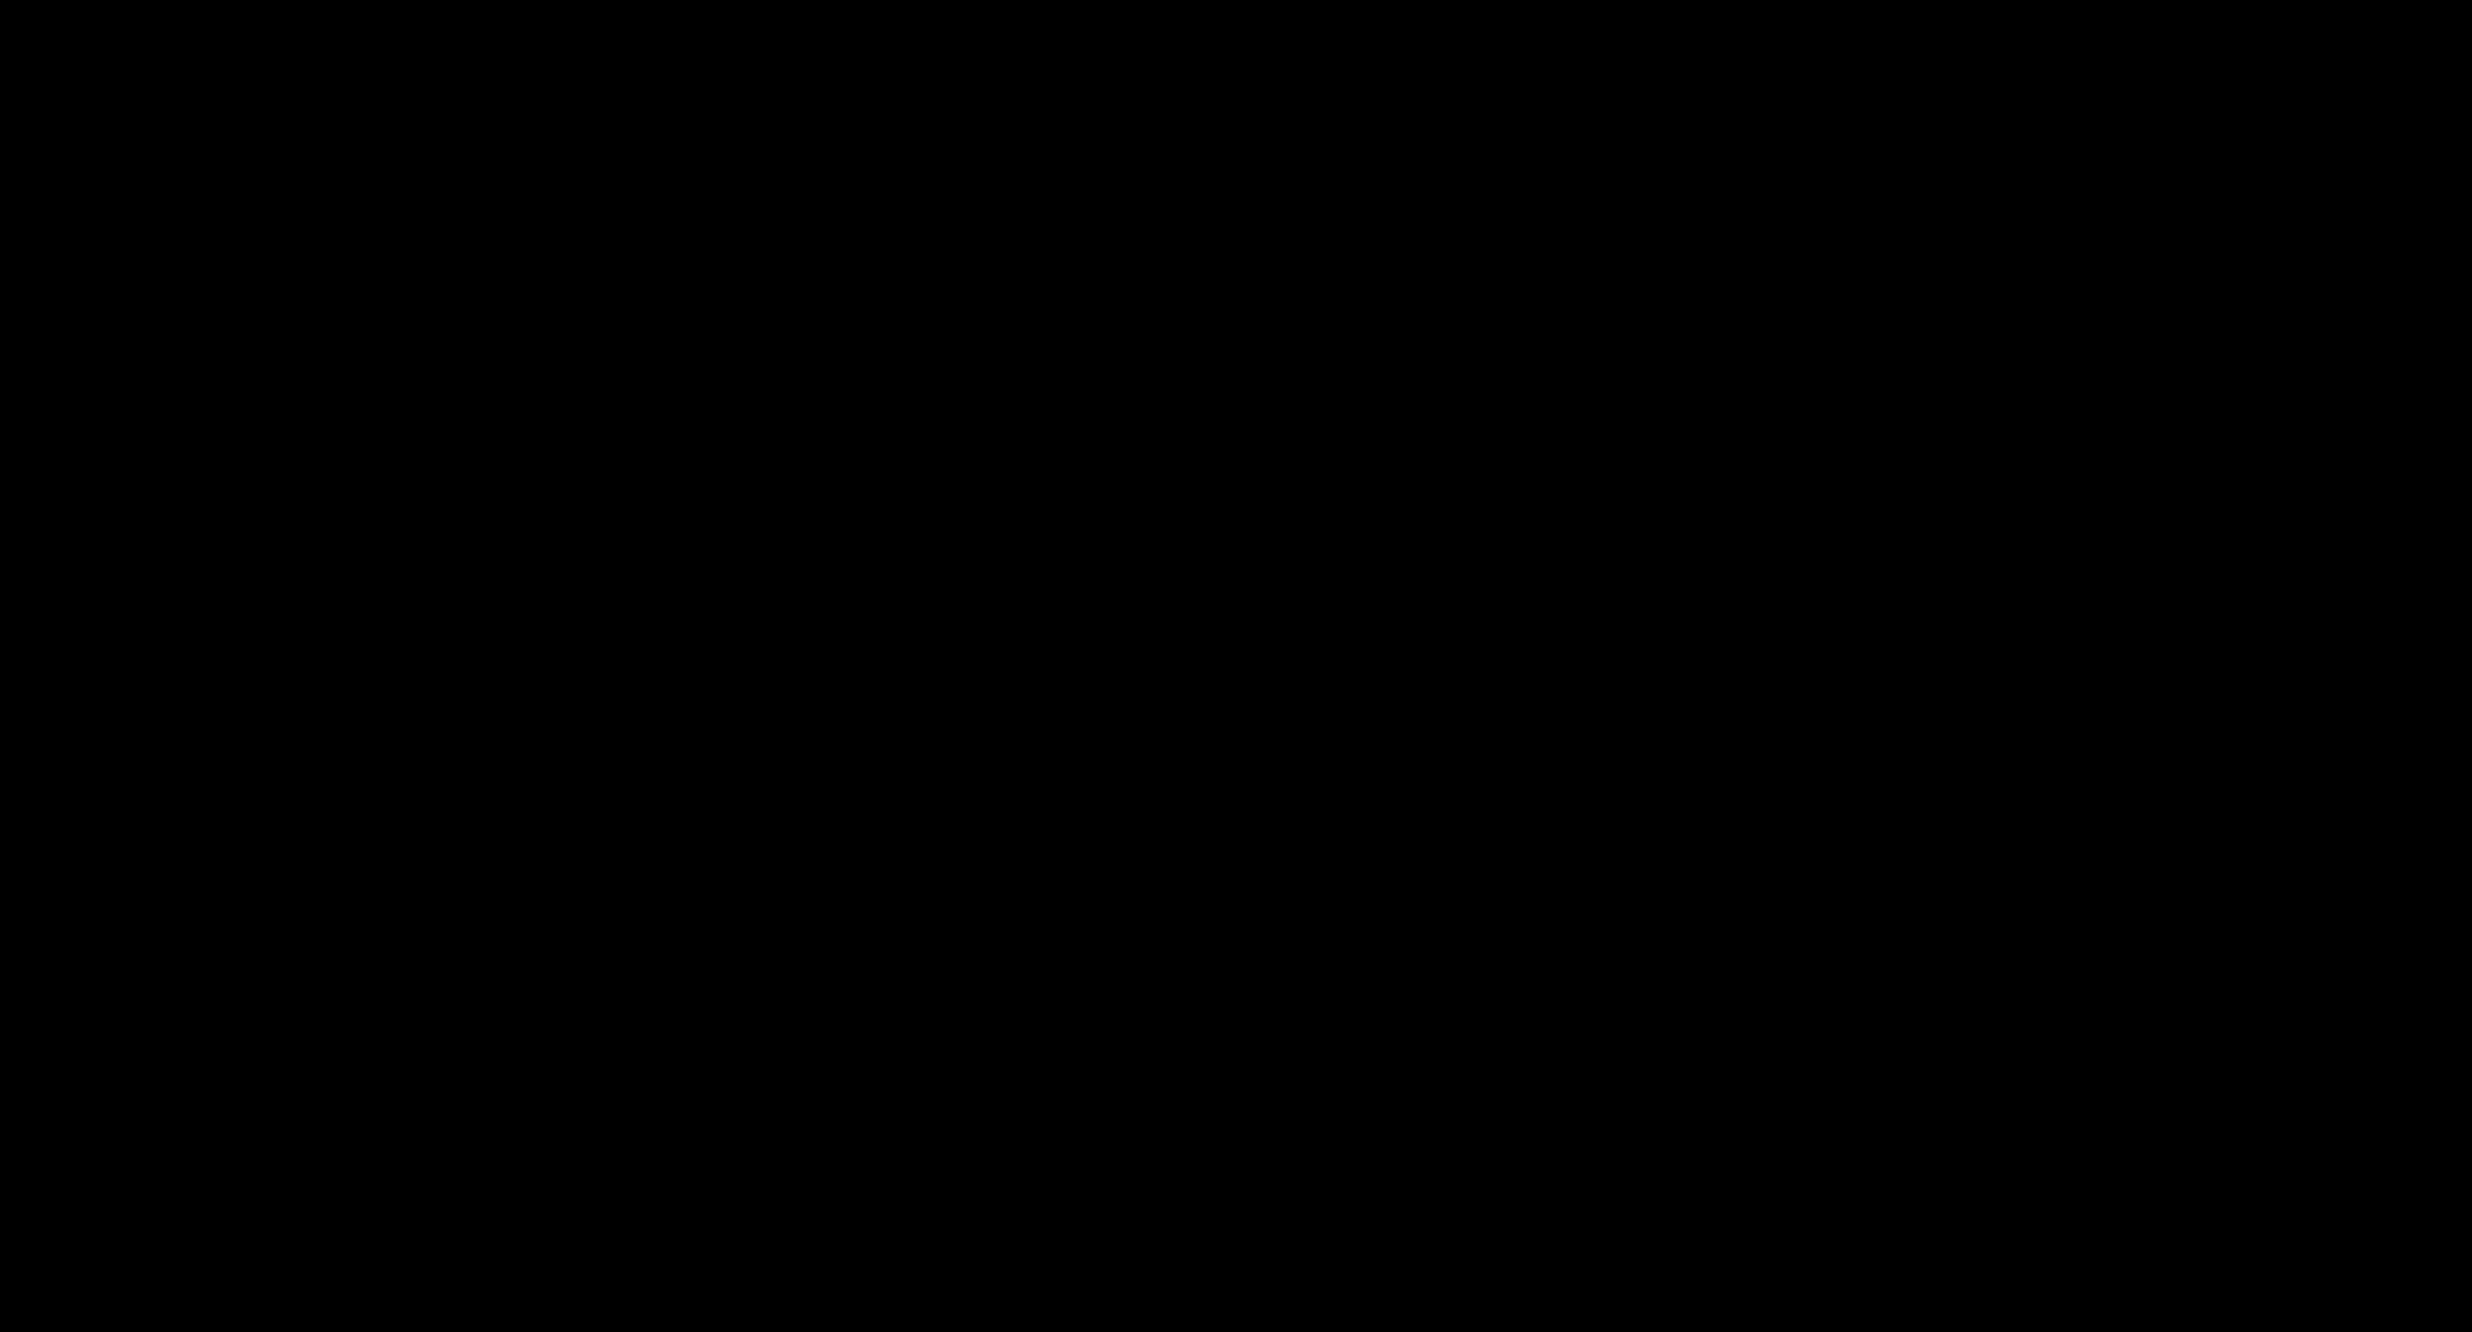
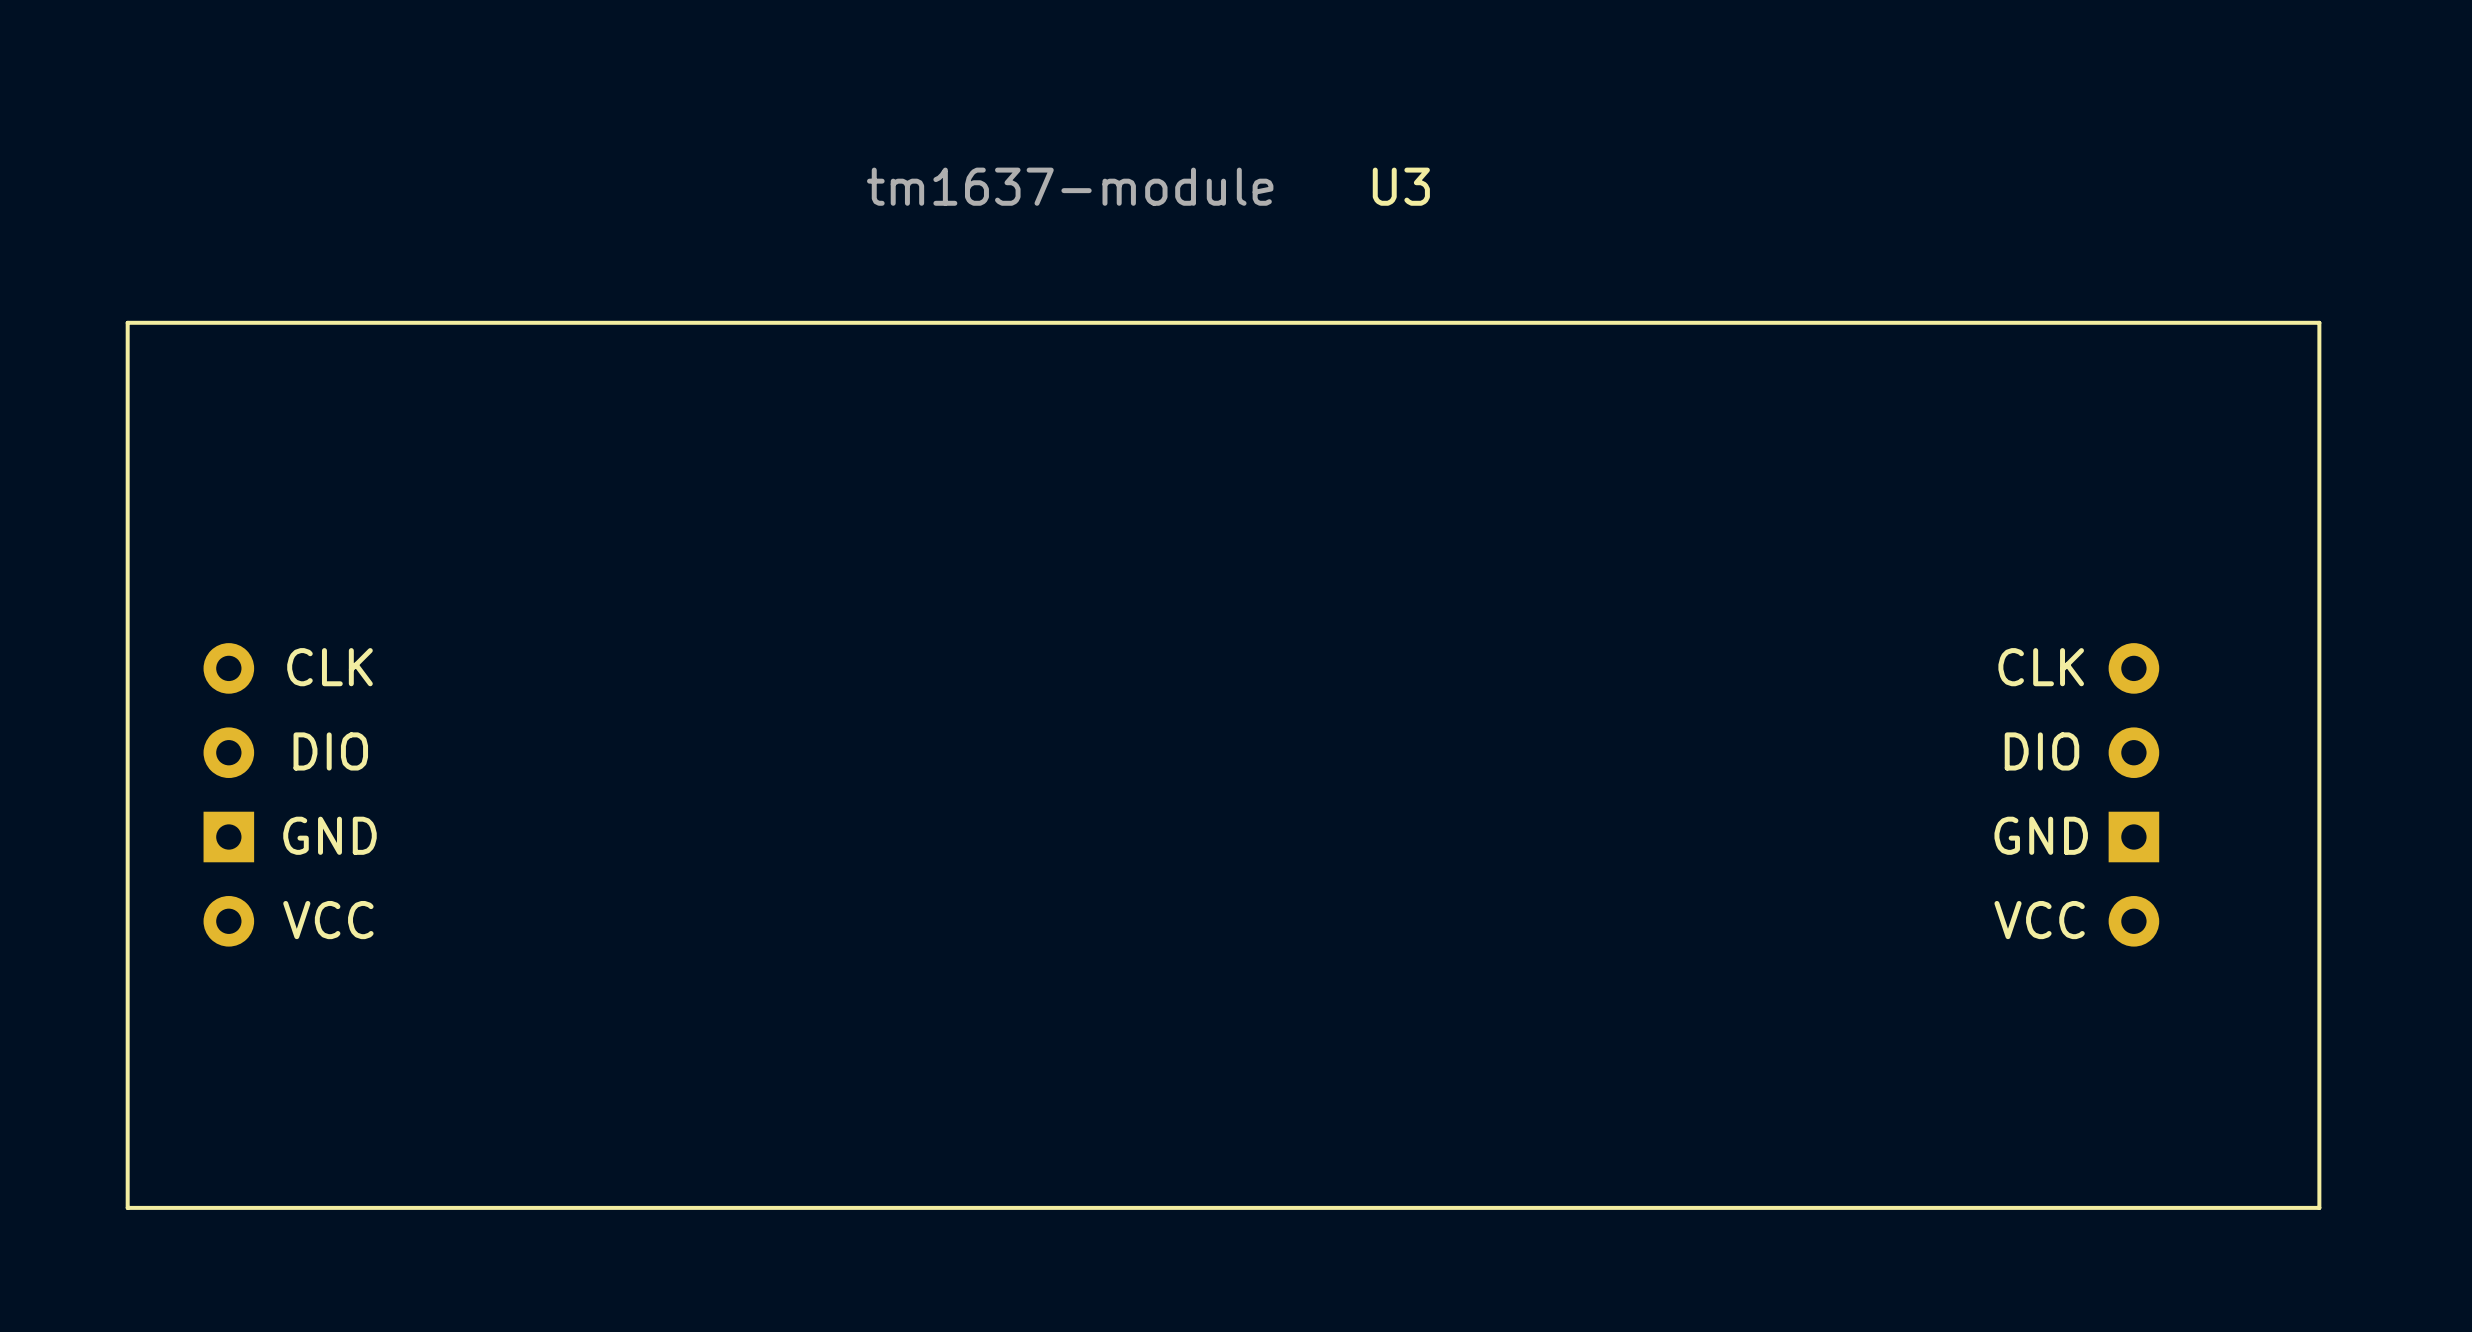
U3: none -> tm1637-module (1223, 765)

